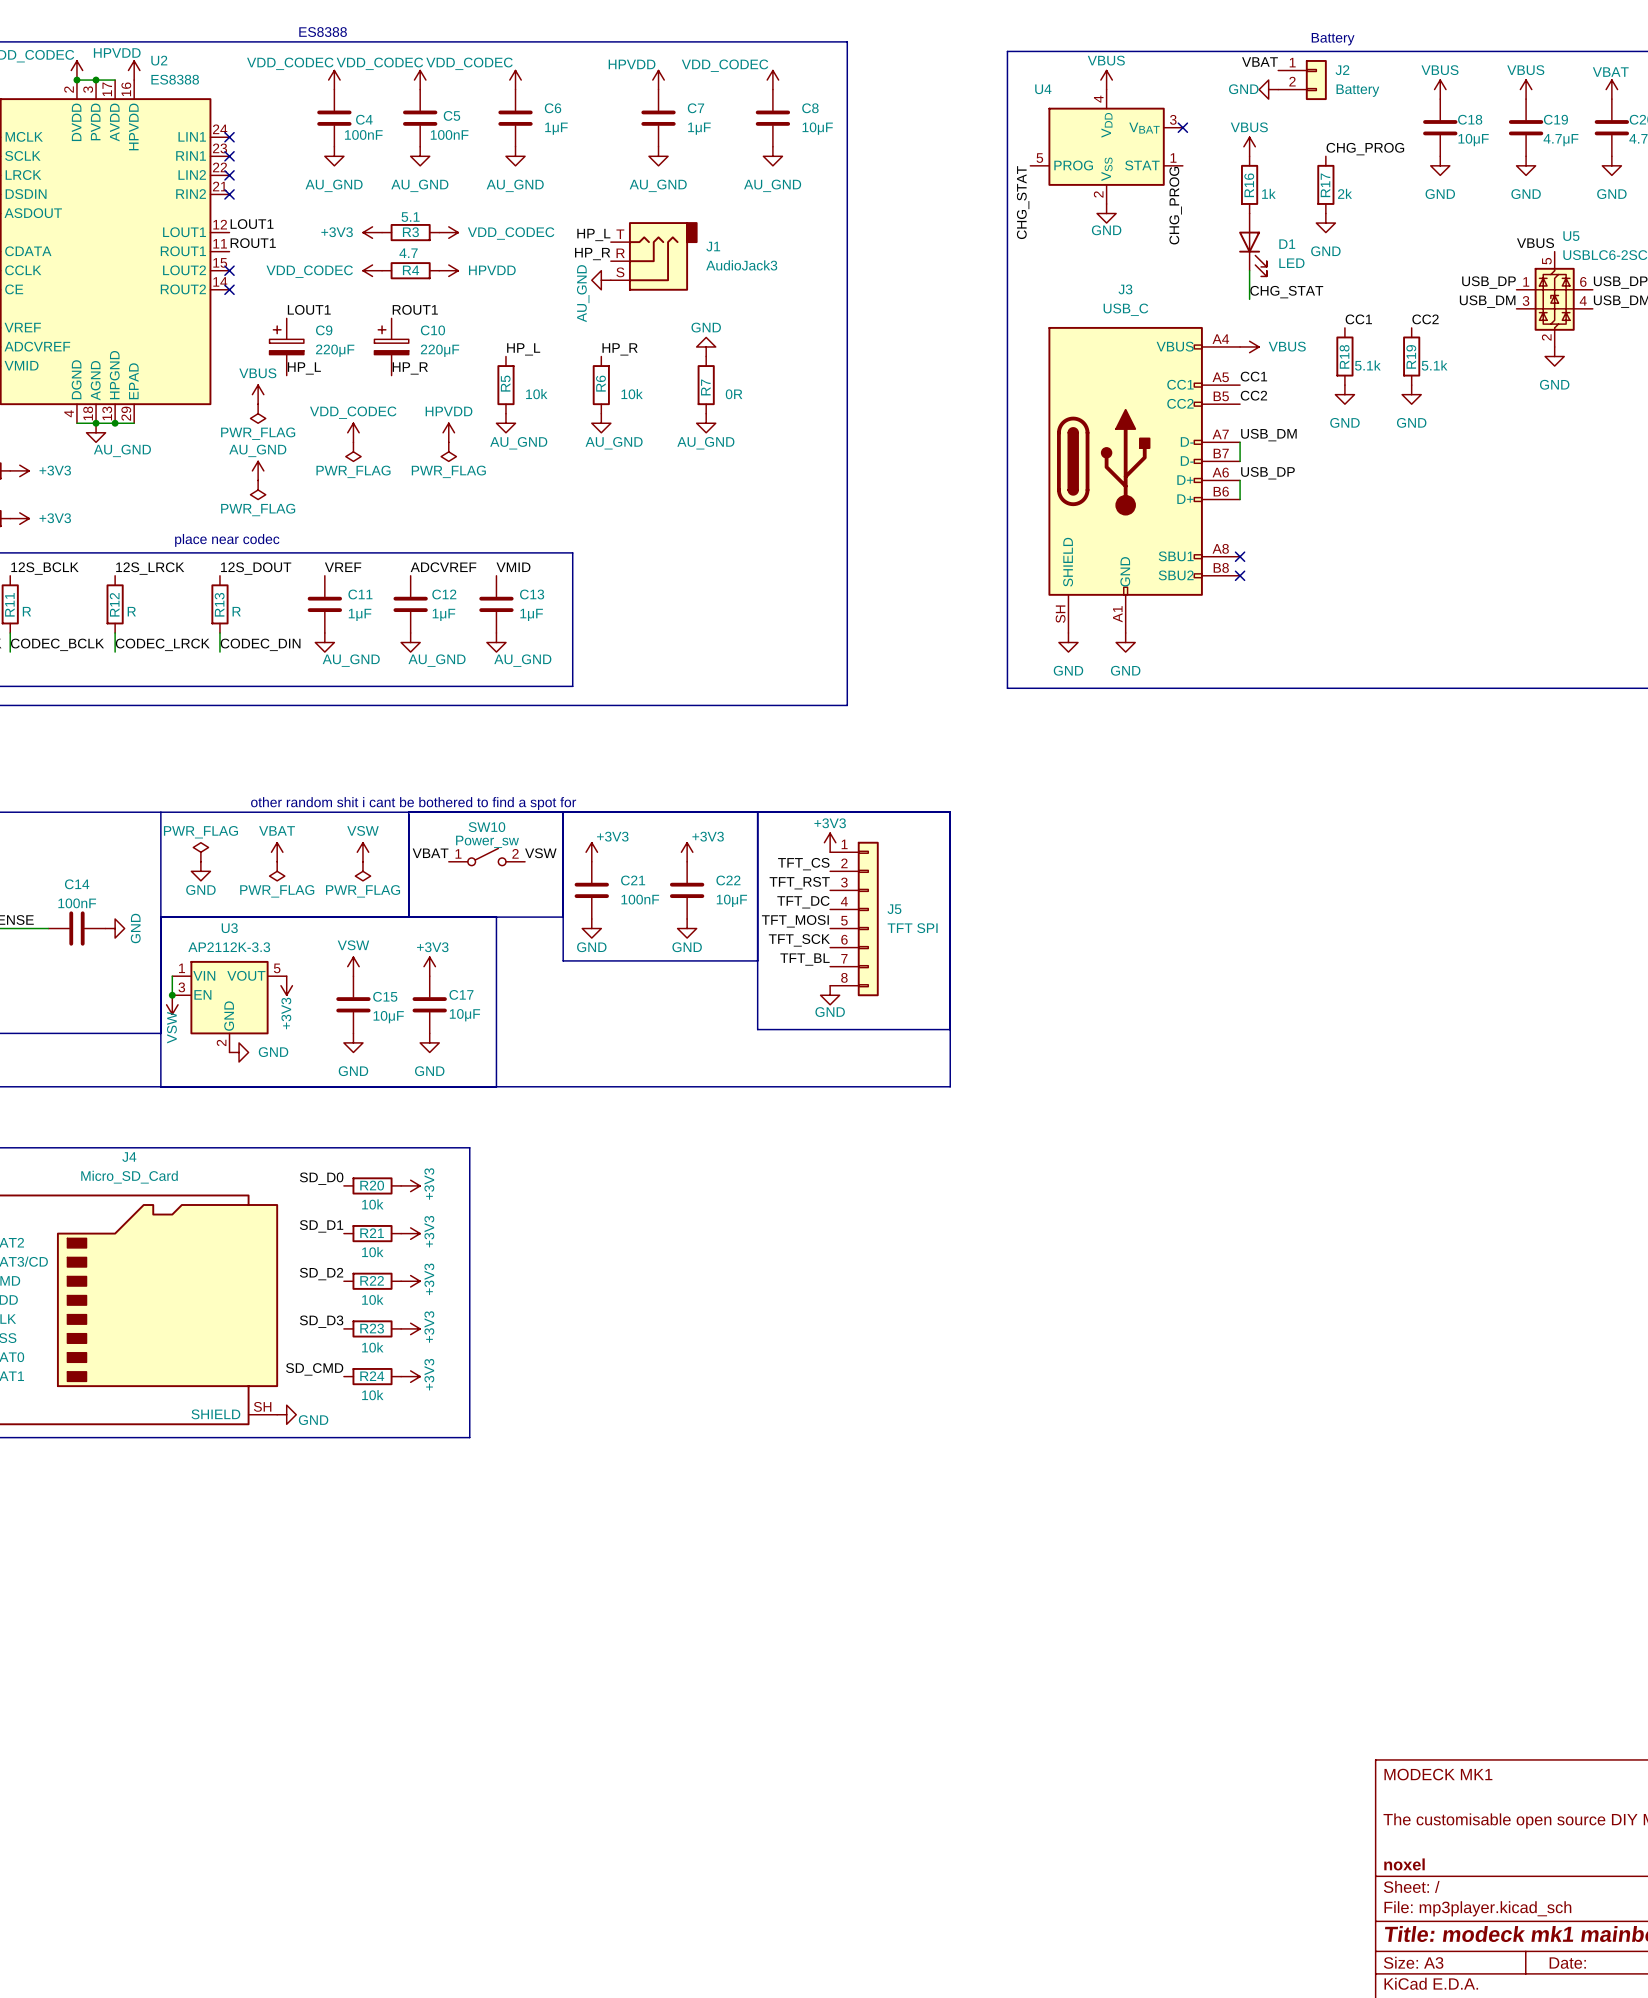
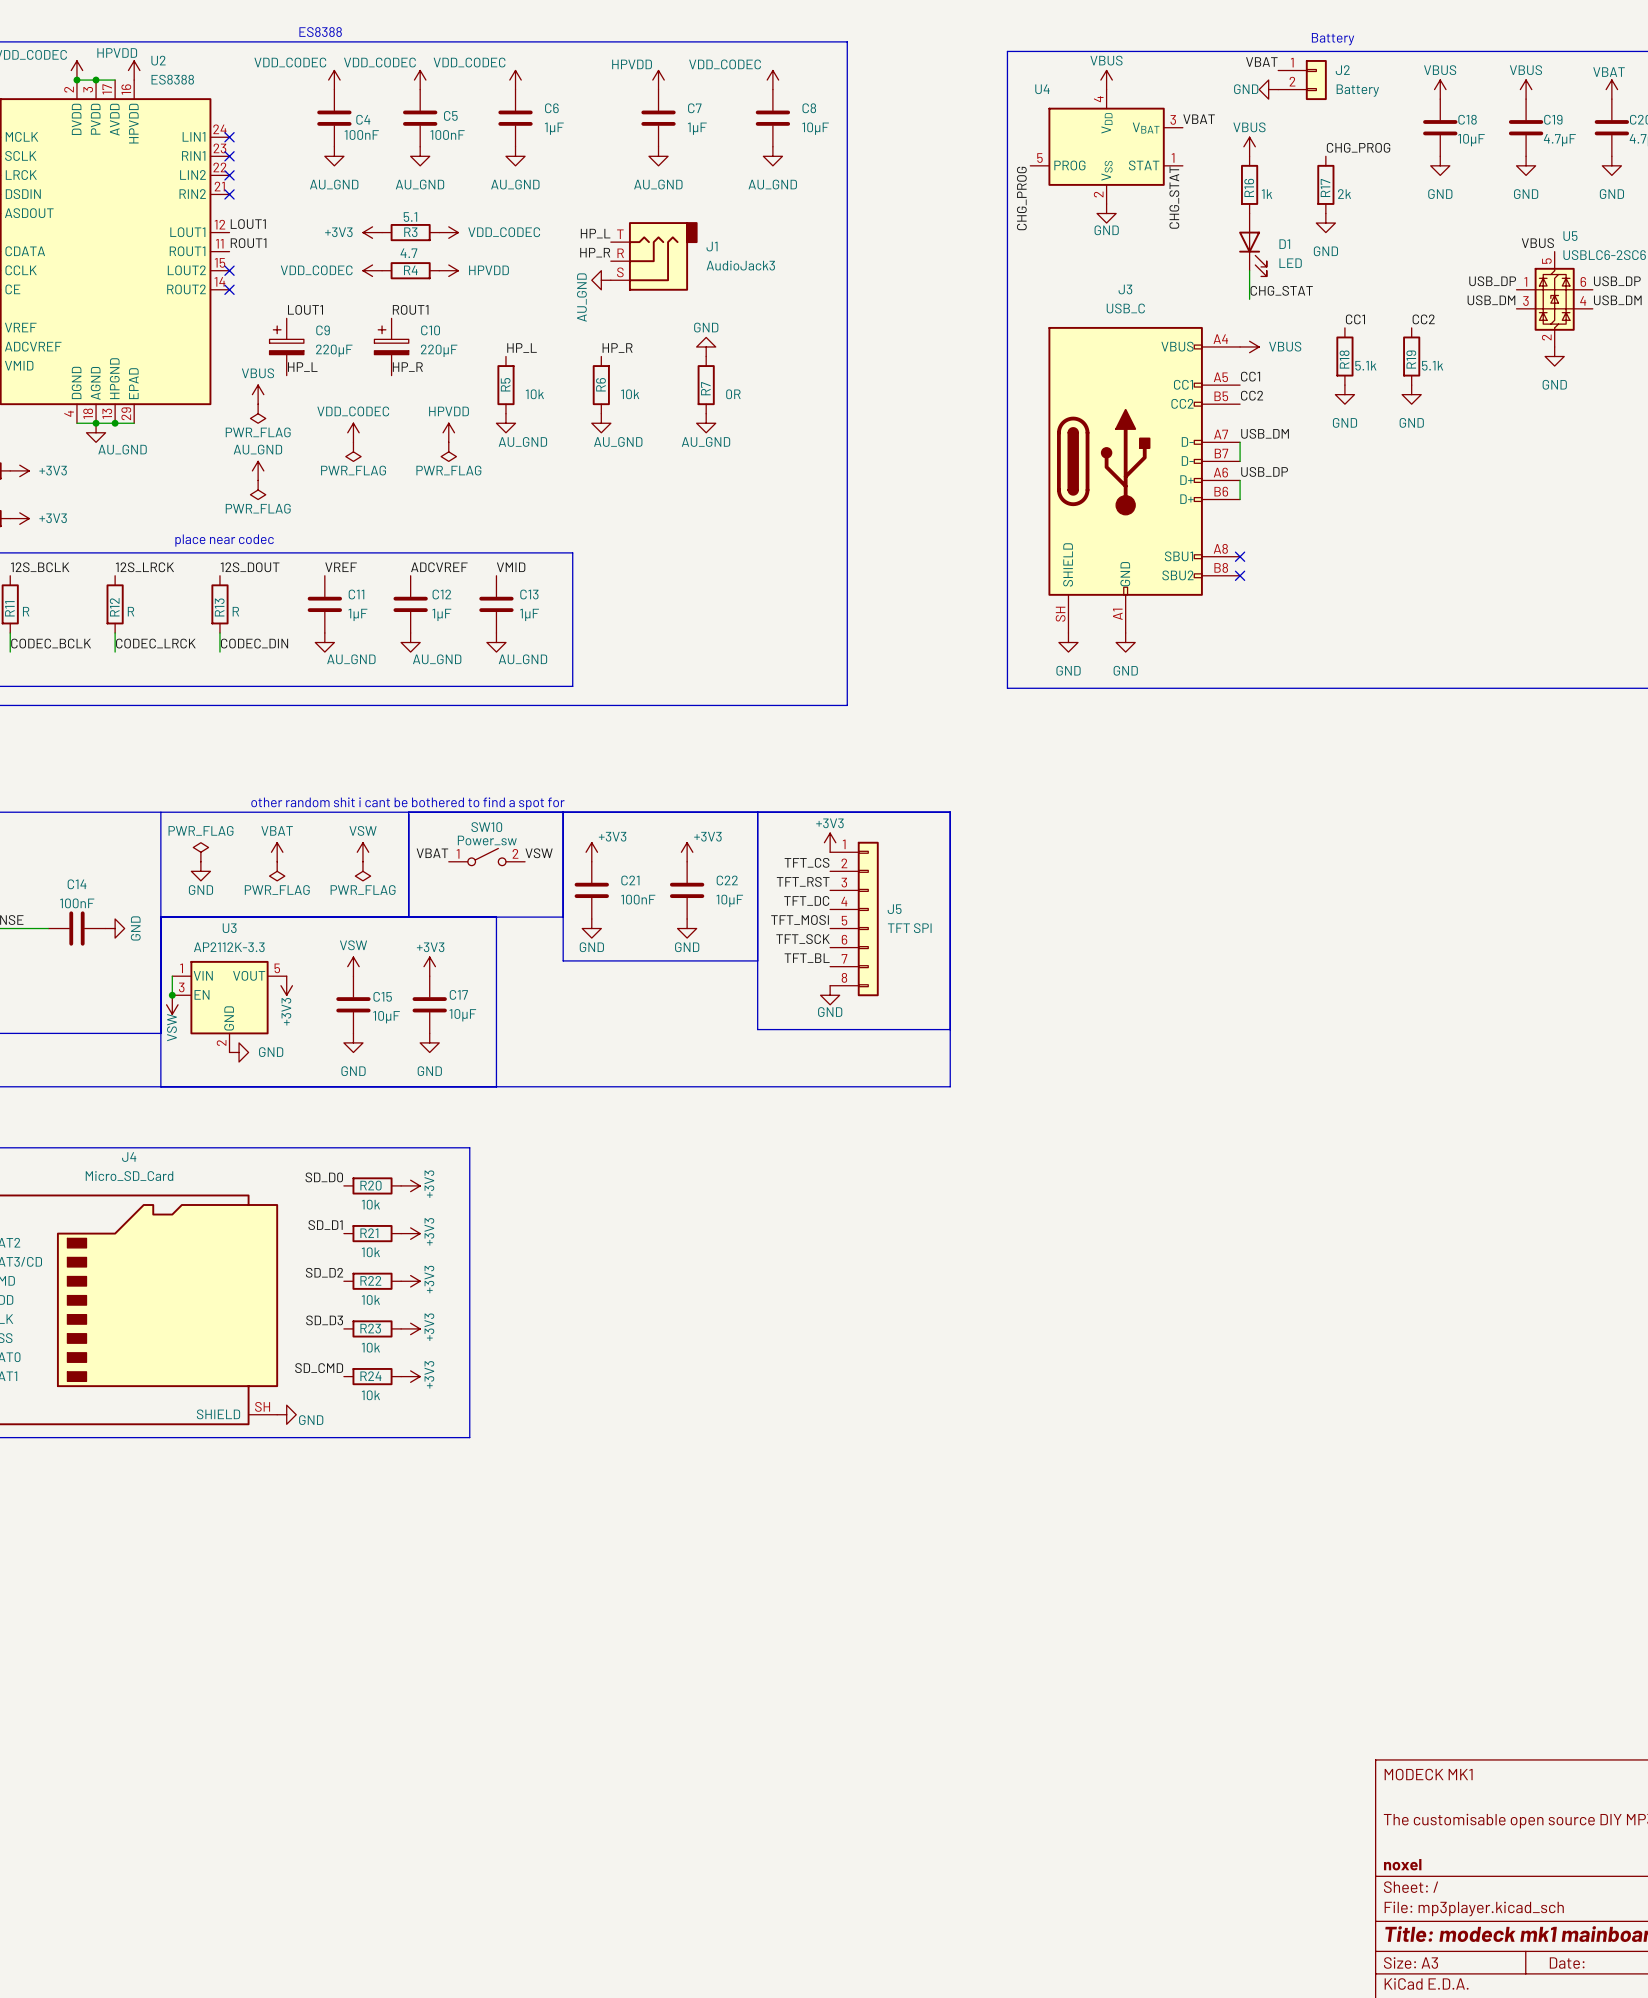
label: none -> VBAT (1199, 119)
no-connect mark: (1182, 127) -> none
label: CHG_STAT (1023, 202) -> CHG_PROG (1021, 198)
label: CHG_PROG (1175, 205) -> CHG_STAT (1174, 197)

